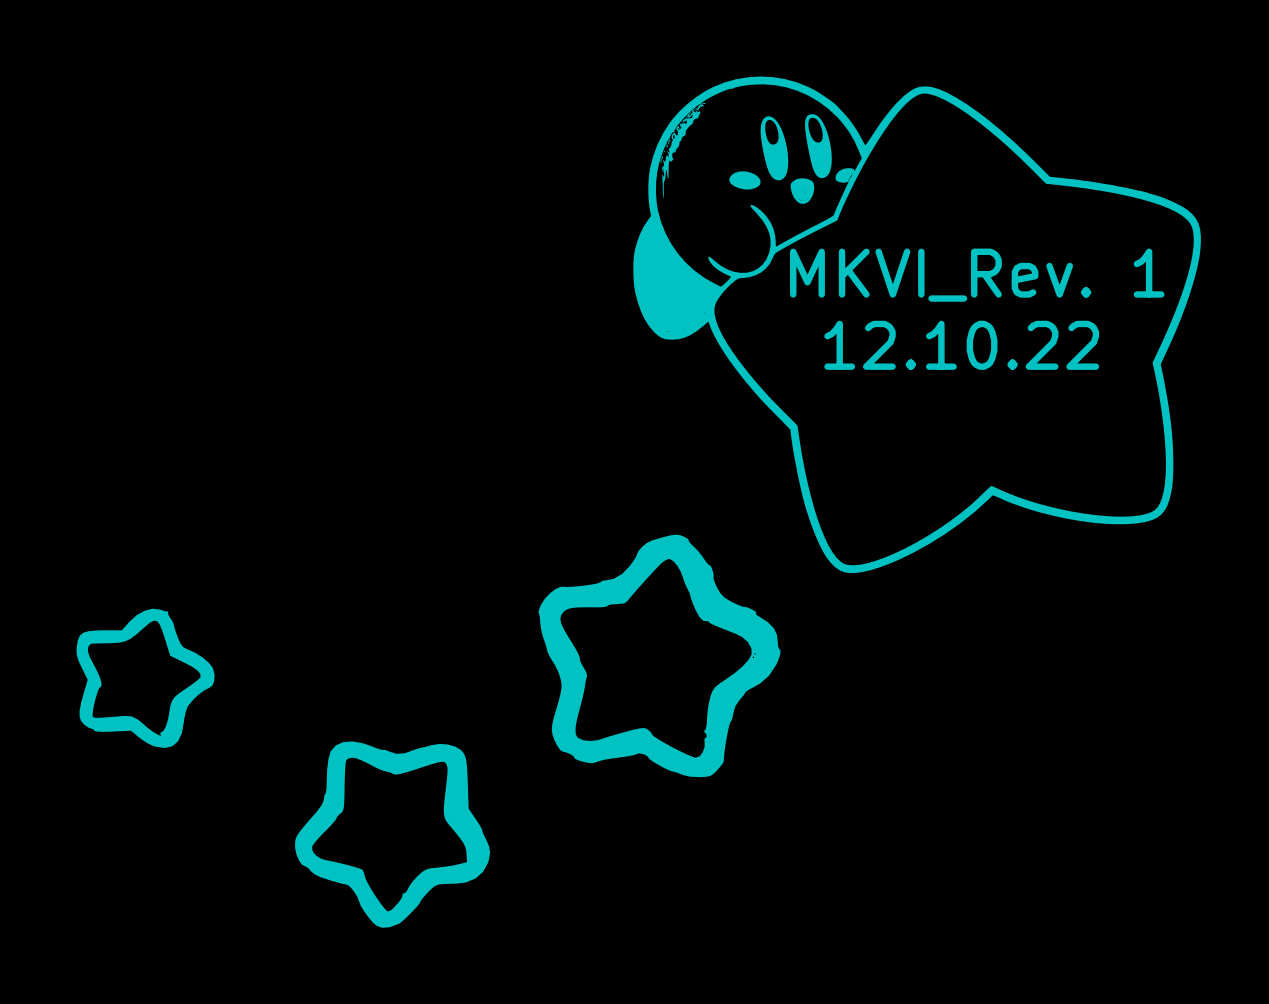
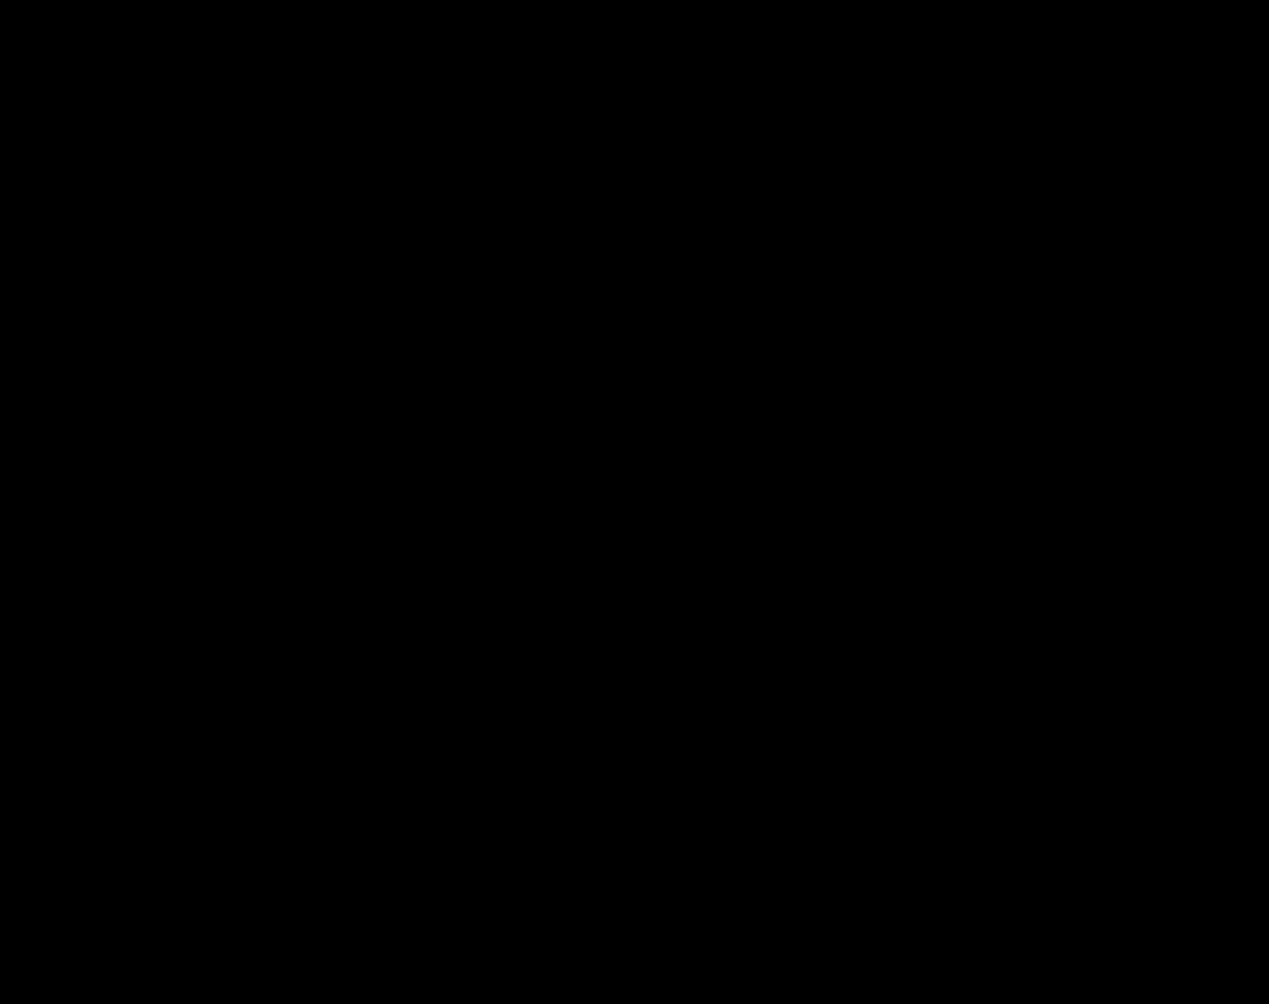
drawing: [76, 76, 1201, 928] -> none
text: MKVI_Rev. 1 (977, 275) -> none
text: 12.10.22 (961, 345) -> none

